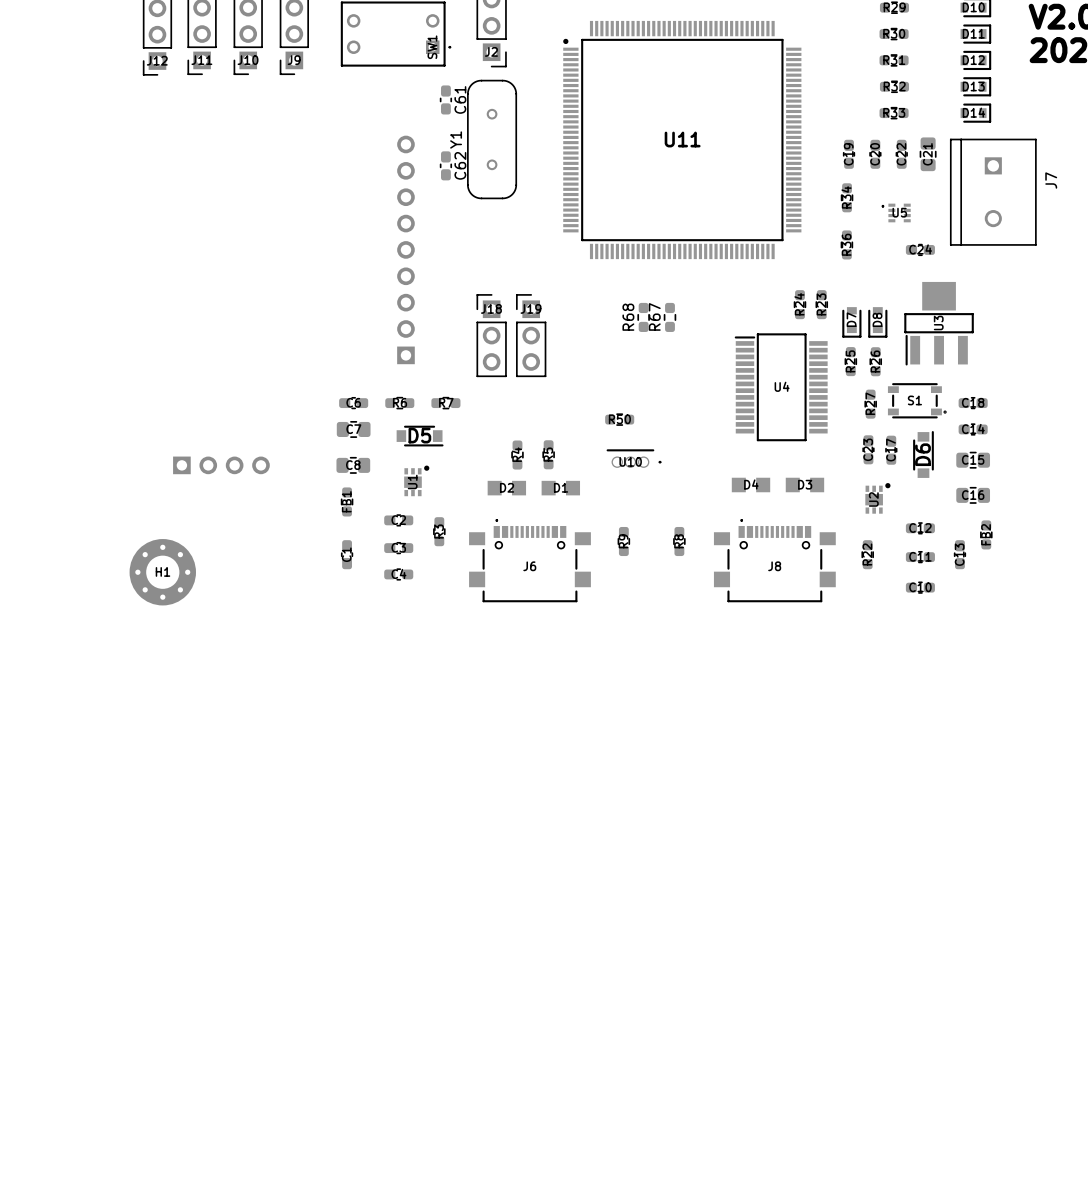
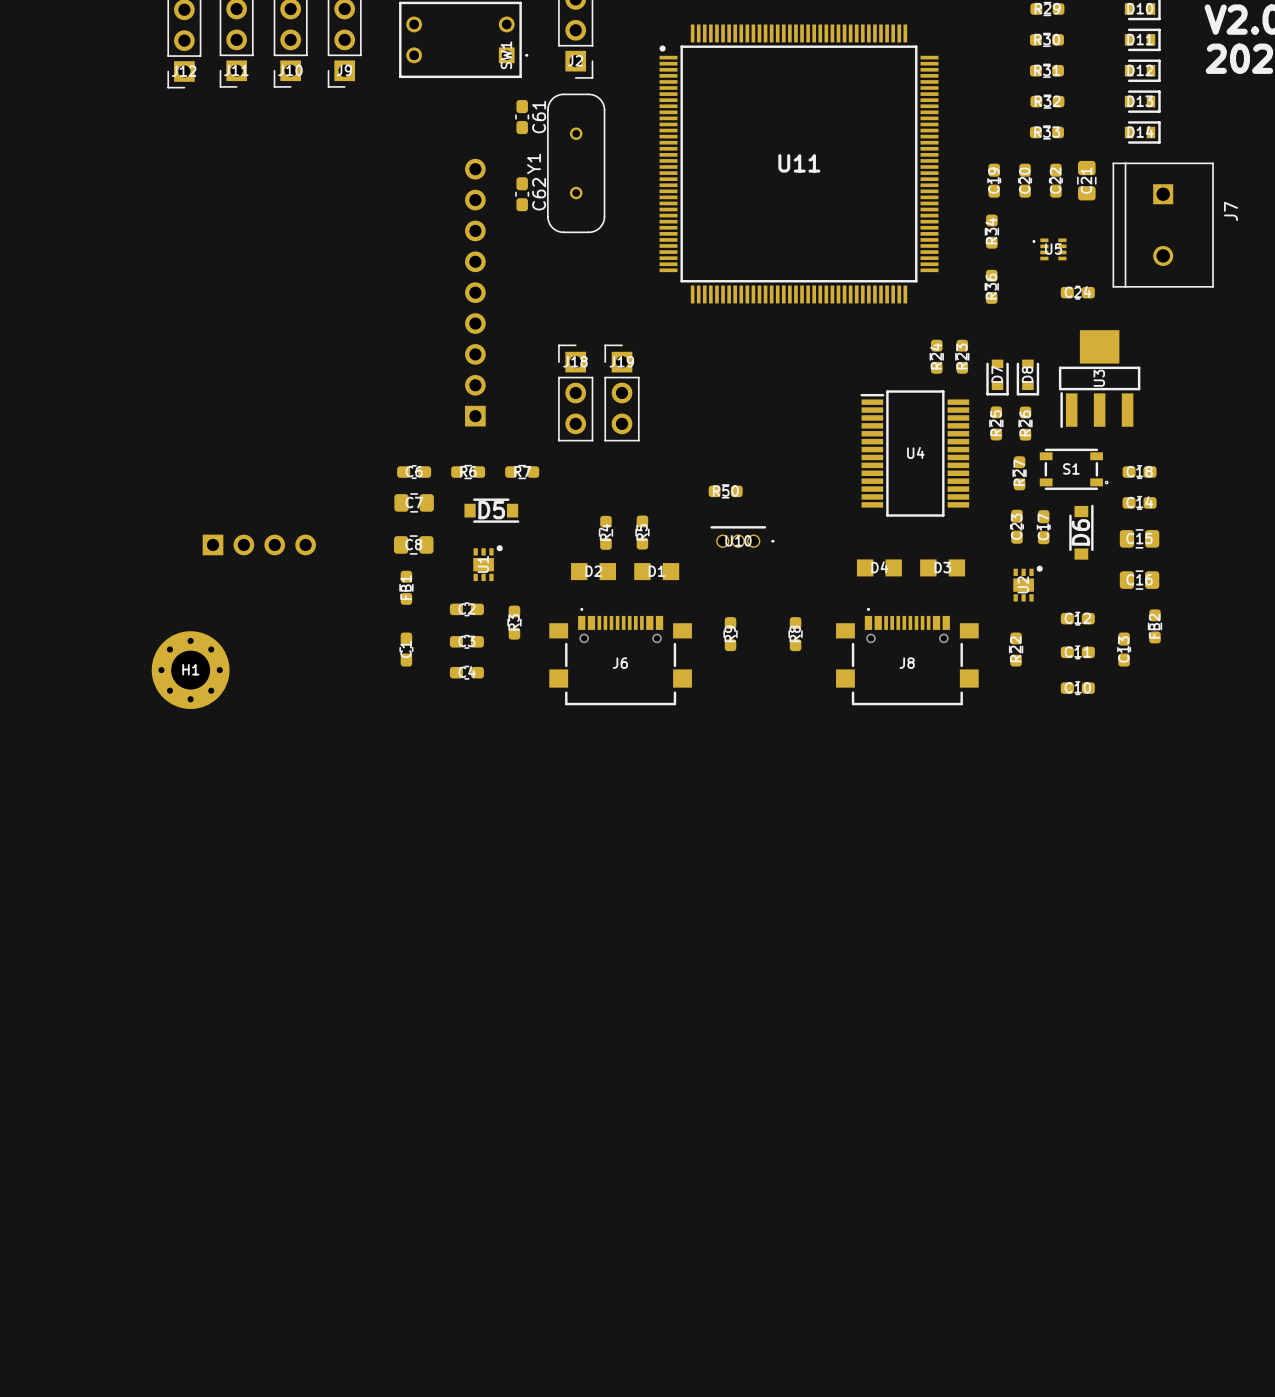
R68: (643, 317) -> none
R67: (669, 317) -> none

